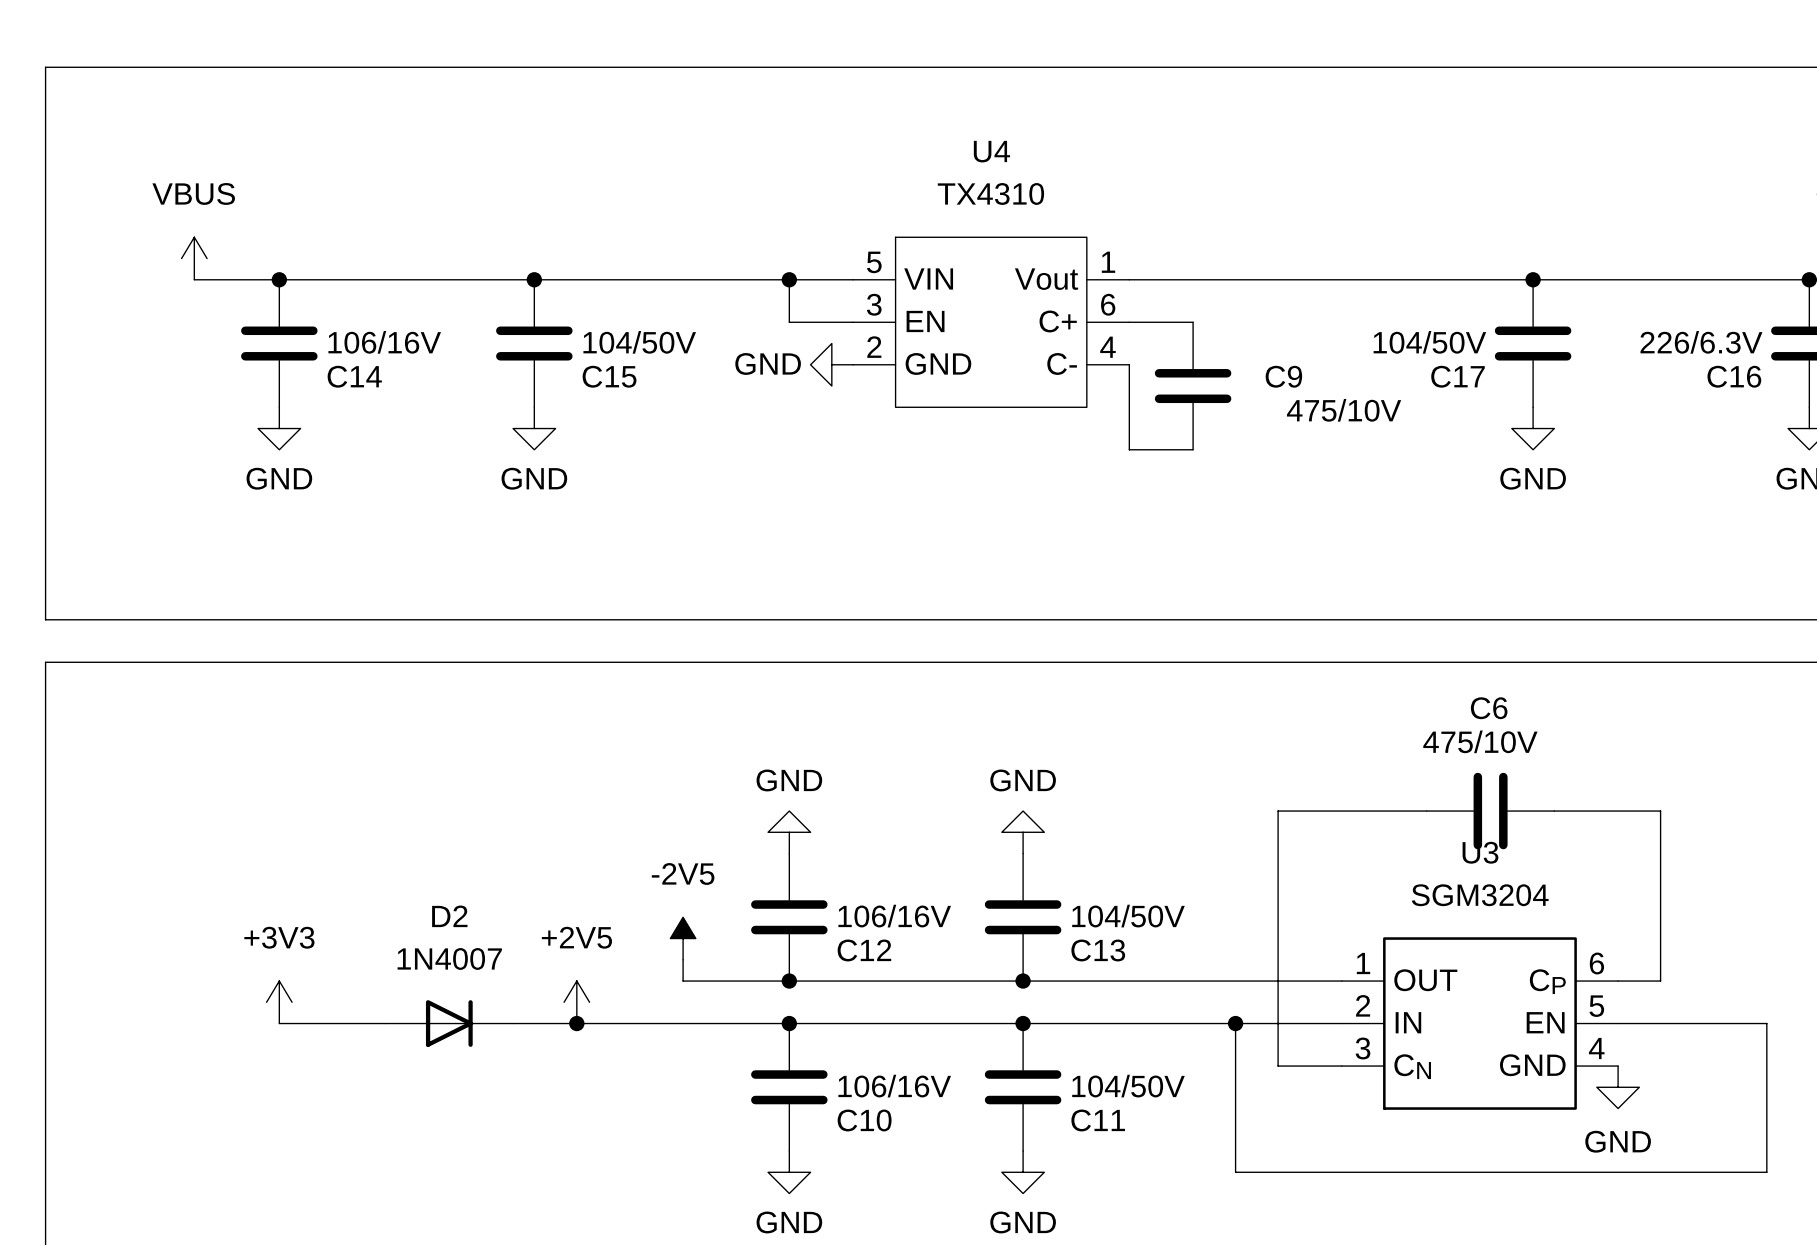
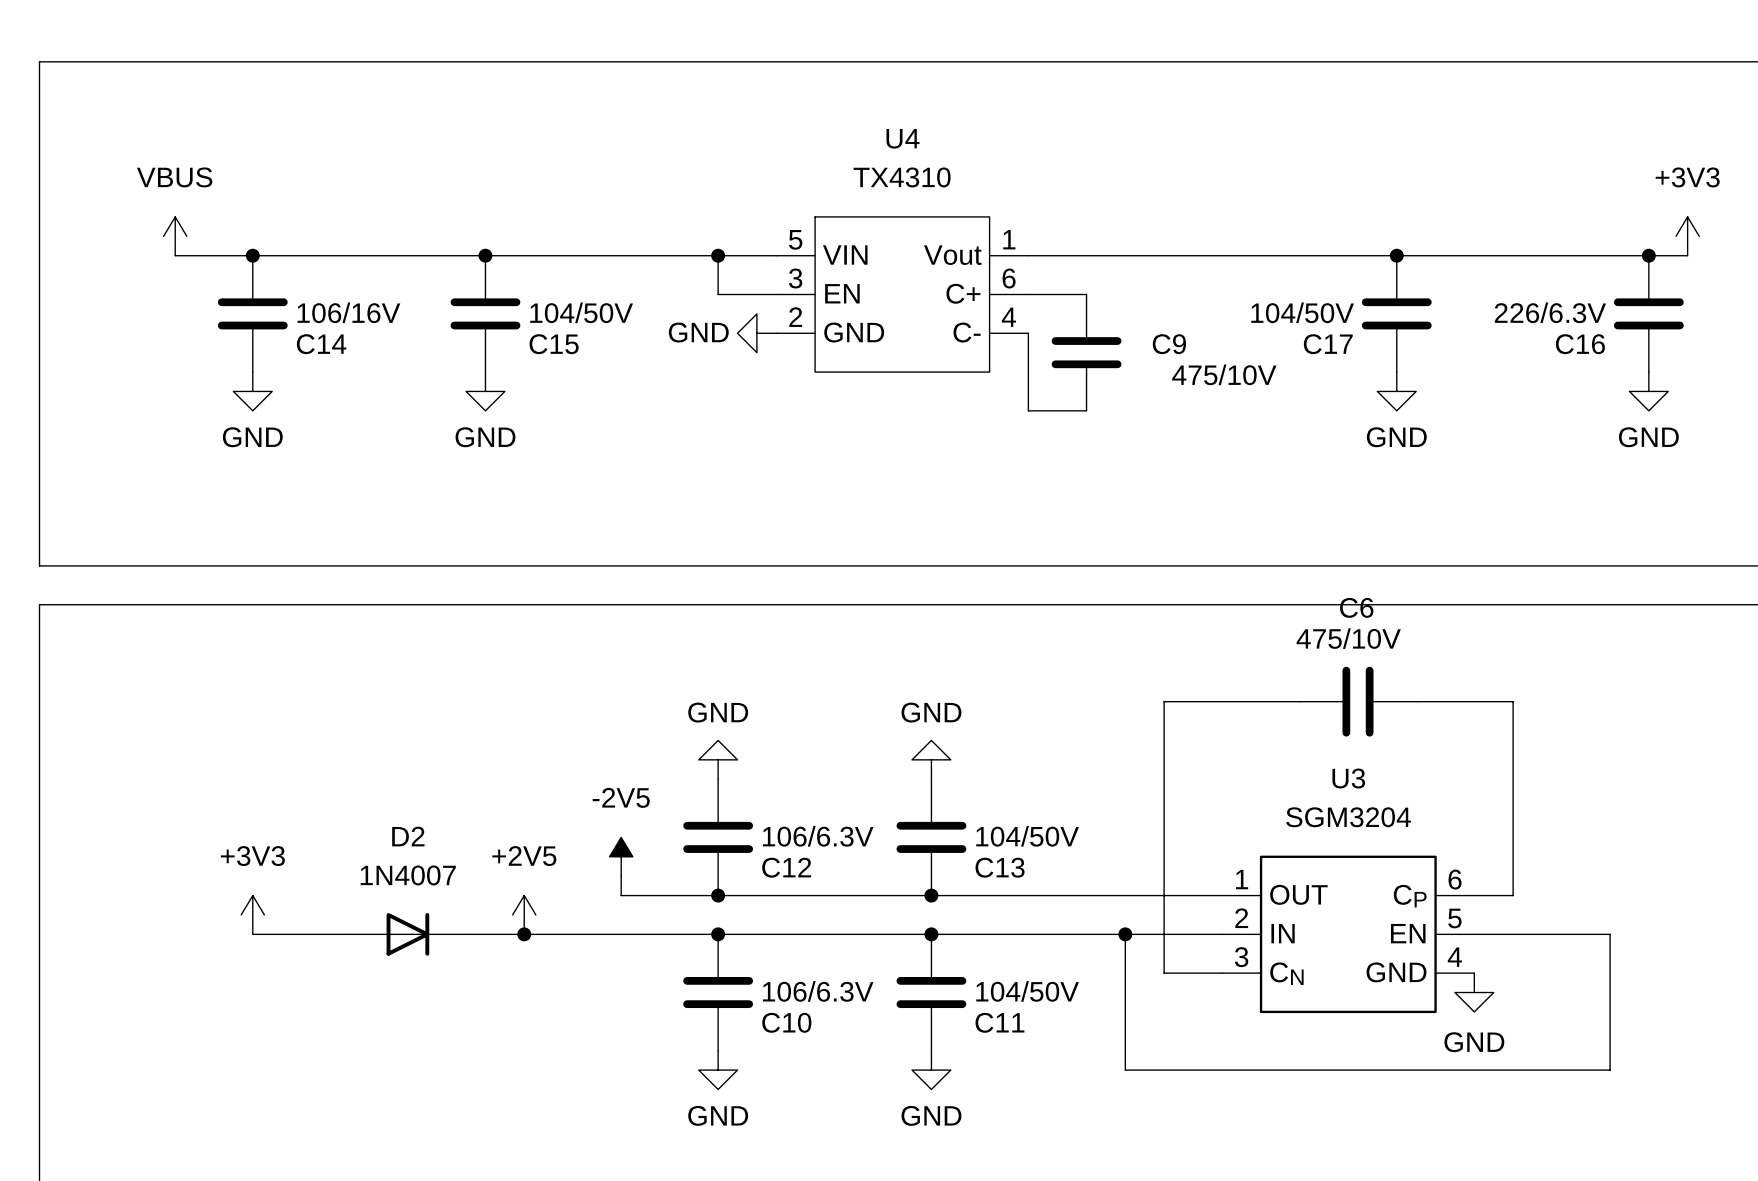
wire: (1278, 811) (1426, 811) -> (1164, 740) (1164, 701) (1299, 701)
C6 position: (1490, 811) -> (1358, 701)
wire: (1554, 811) (1660, 811) -> (1416, 701) (1513, 701) (1513, 740)
C12 value: 106/16V (894, 916) -> 106/6.3V (818, 836)
C10 value: 106/16V (894, 1086) -> 106/6.3V (818, 991)

